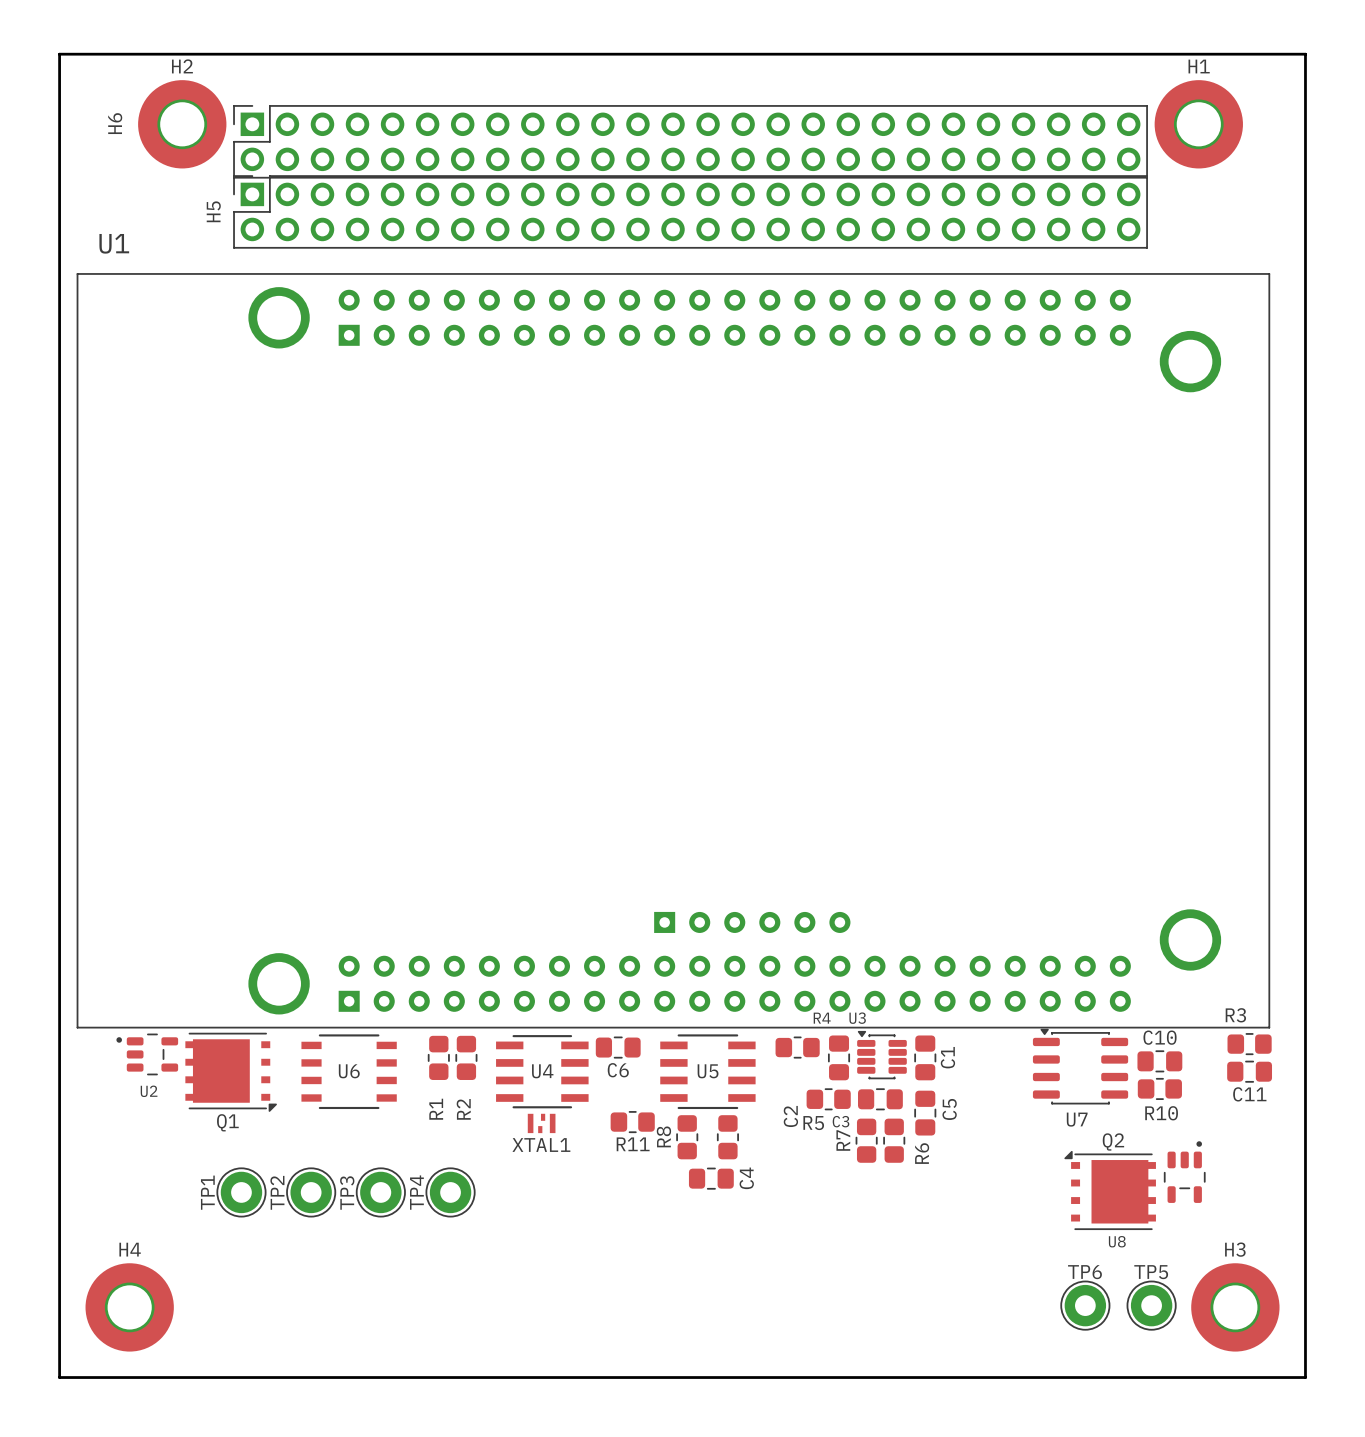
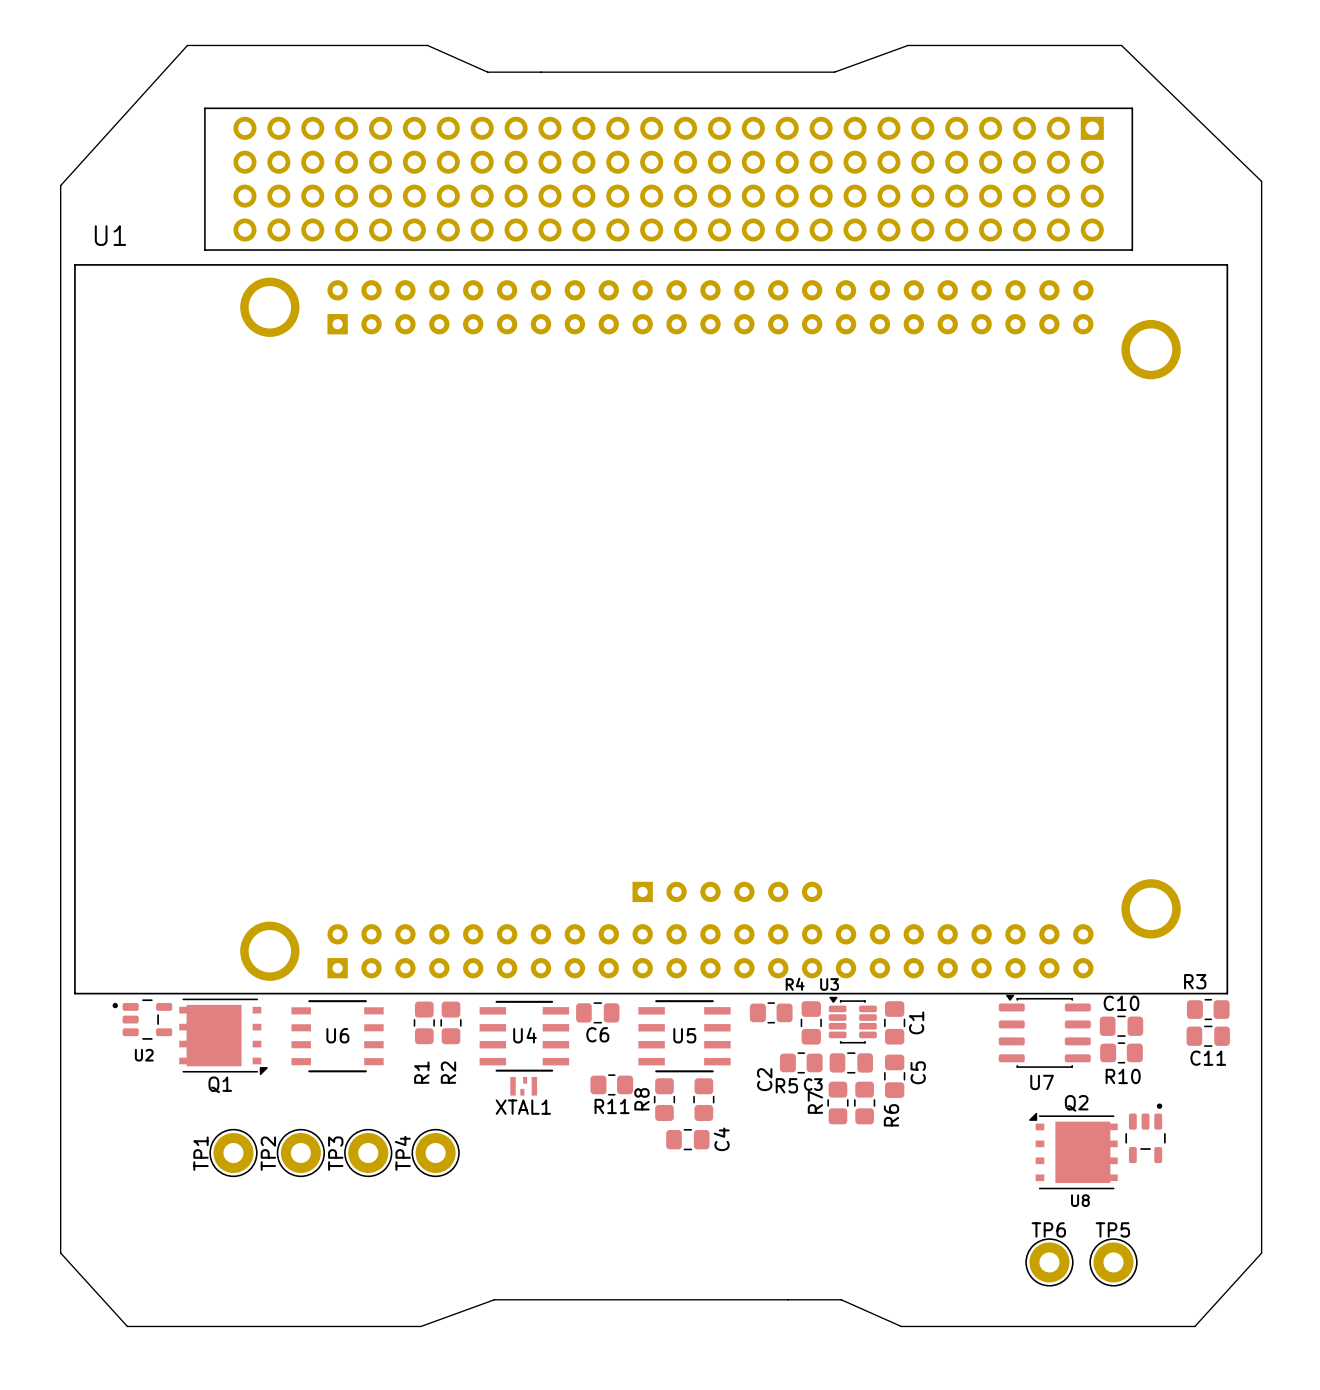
board edge: (59, 54) (1305, 54) (1305, 1377) (59, 1377) (59, 54) -> (187, 45) (60, 185) (60, 1253) (127, 1326) (420, 1326) (494, 1299) (841, 1299) (901, 1326) (1194, 1326) (1261, 1253) (1261, 181) (1121, 45) (908, 45) (834, 72) (487, 72) (427, 45) (187, 45)
H2: (182, 124) -> none
H1: (1198, 124) -> none
H6: (690, 141) -> none
part: none -> (668, 179)
H5: (690, 211) -> none
H4: (129, 1307) -> none
H3: (1235, 1307) -> none

